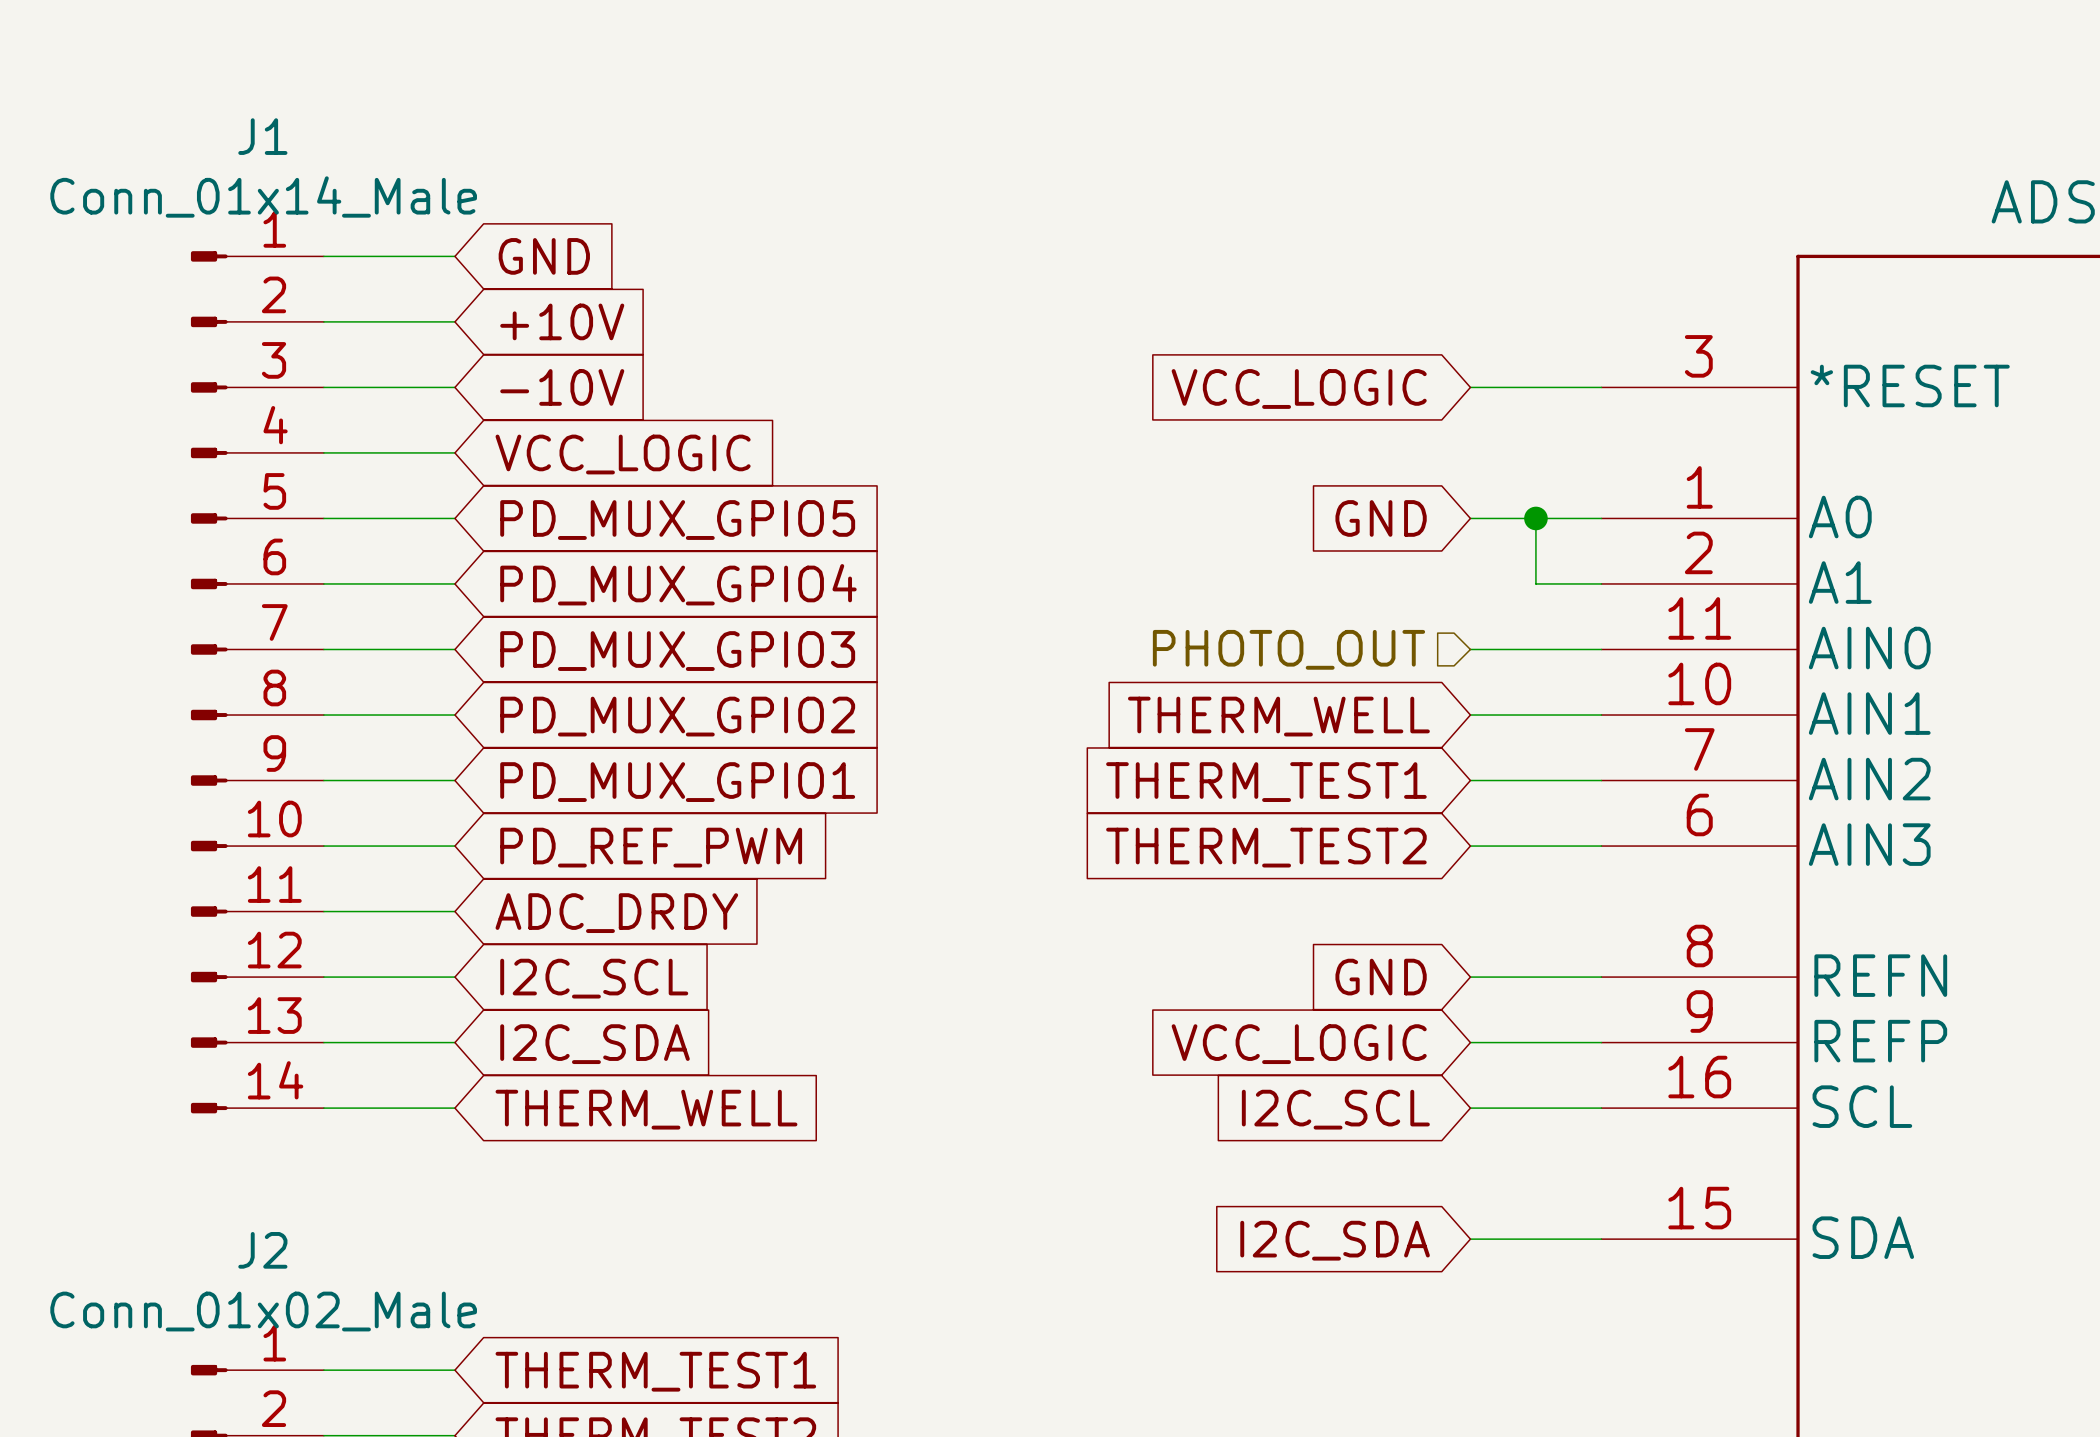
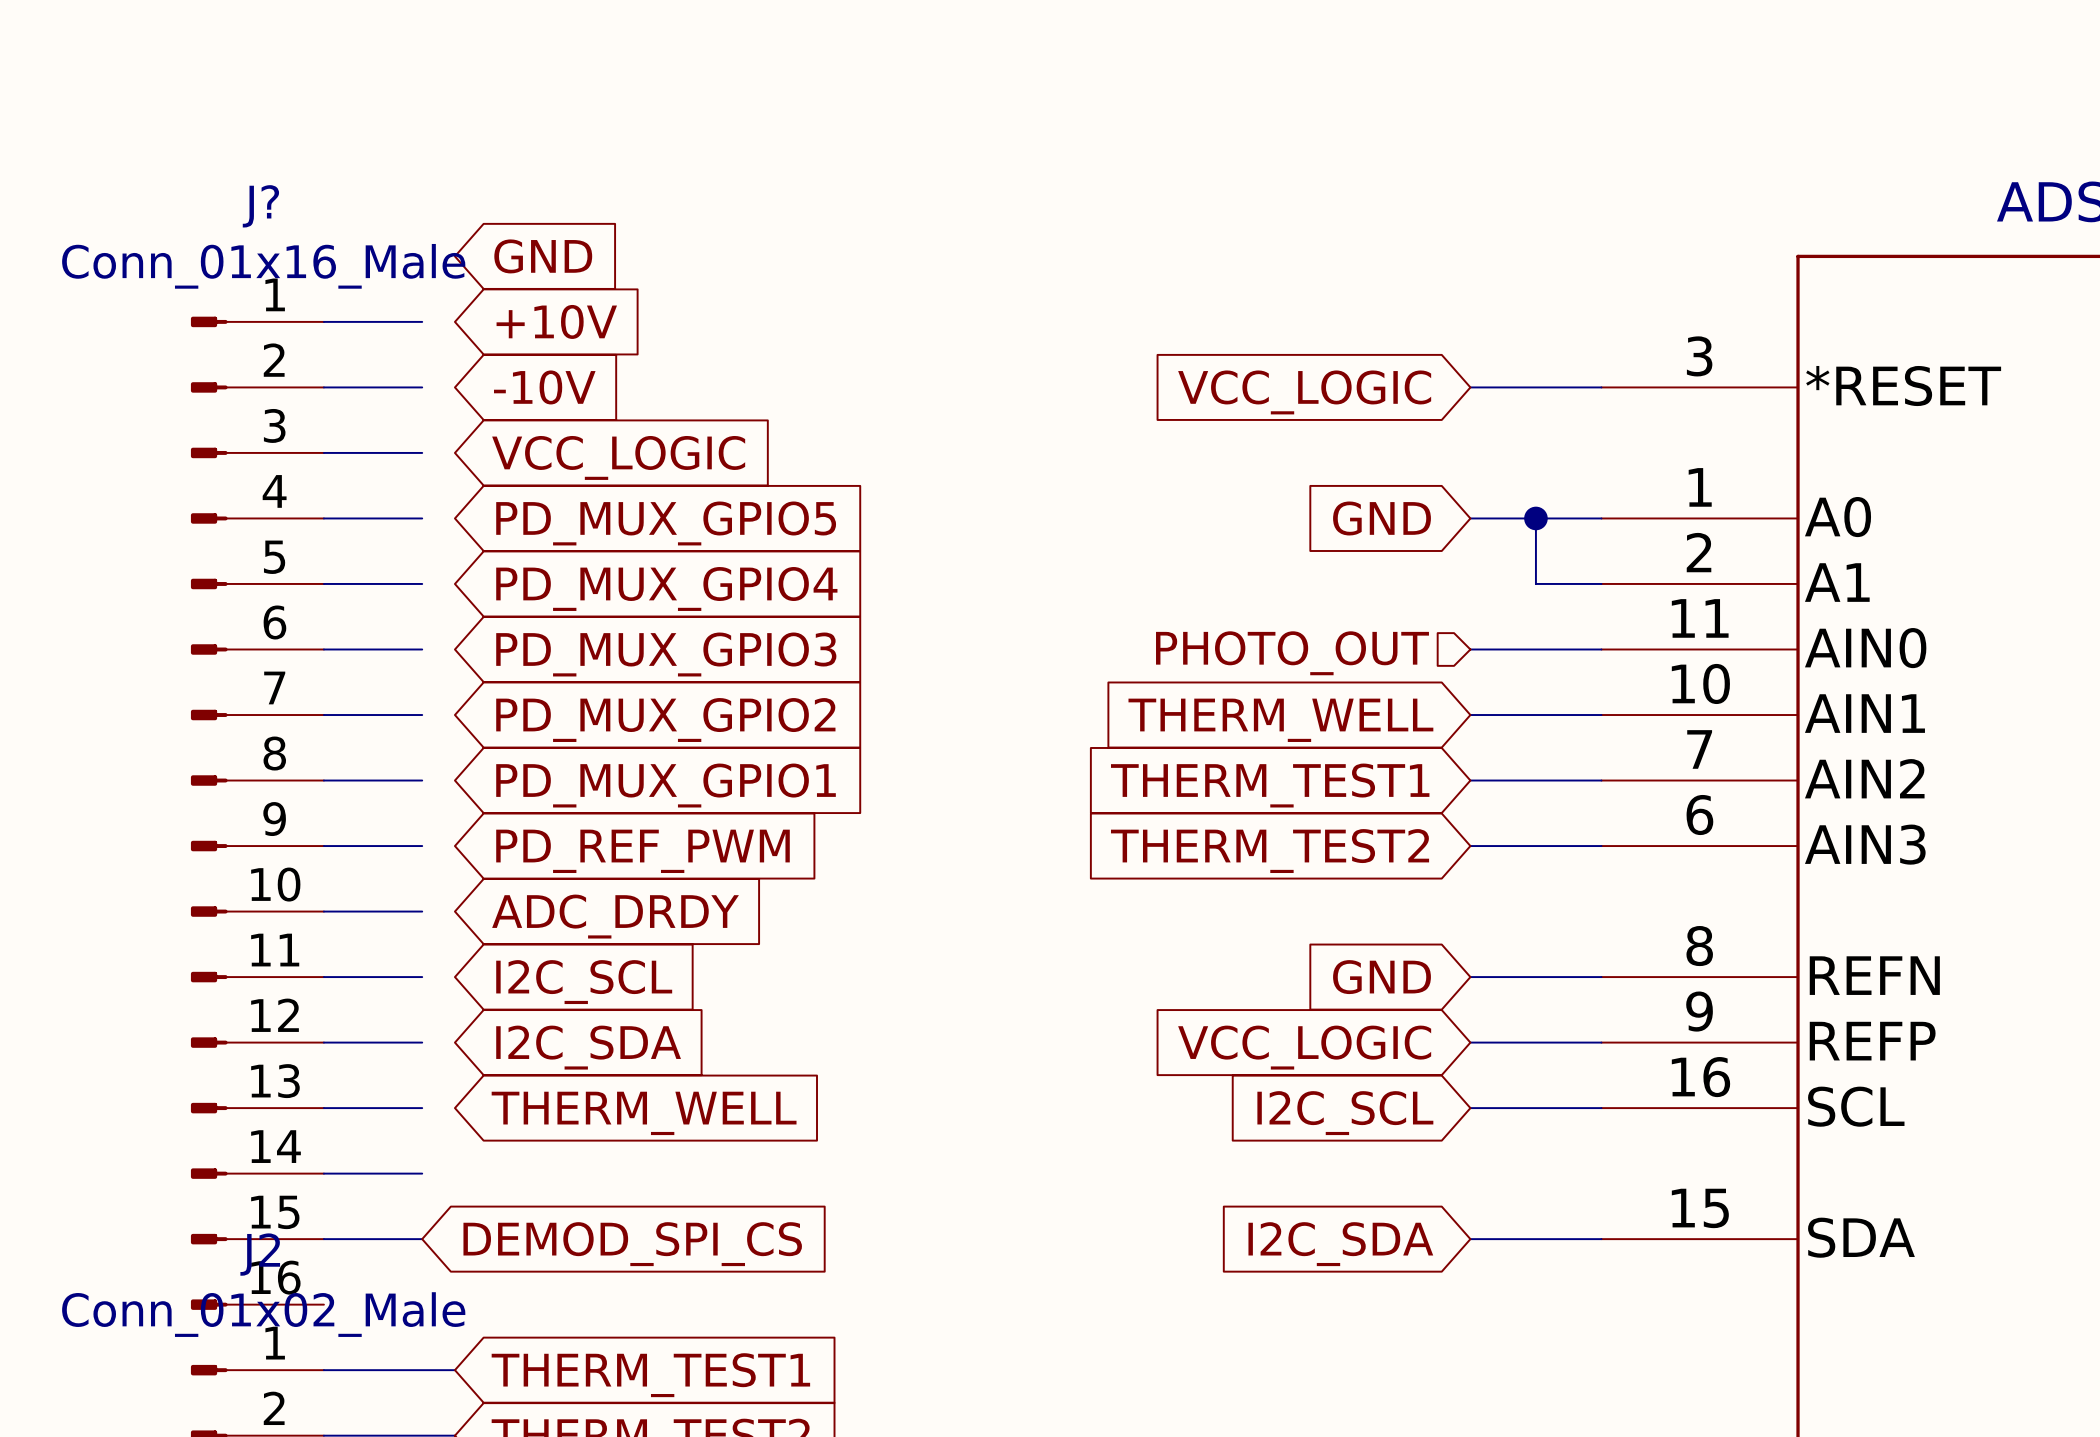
wire: (323, 256) (454, 256) -> none
wire: (422, 321) (454, 321) -> none
wire: (422, 387) (454, 387) -> none
wire: (422, 452) (454, 452) -> none
wire: (422, 518) (454, 518) -> none
wire: (422, 583) (454, 583) -> none
wire: (422, 649) (454, 649) -> none
J1: Conn_01x14_Male (257, 682) -> none
wire: (422, 715) (454, 715) -> none
wire: (422, 780) (454, 780) -> none
J?: none -> Conn_01x16_Male (257, 813)
wire: (422, 846) (454, 846) -> none
wire: (422, 911) (454, 911) -> none
wire: (422, 977) (454, 977) -> none
wire: (422, 1042) (454, 1042) -> none
wire: (422, 1108) (454, 1108) -> none
wire: none -> (323, 1173) (422, 1173)
wire: none -> (323, 1239) (422, 1239)
global label: none -> DEMOD_SPI_CS (632, 1244)

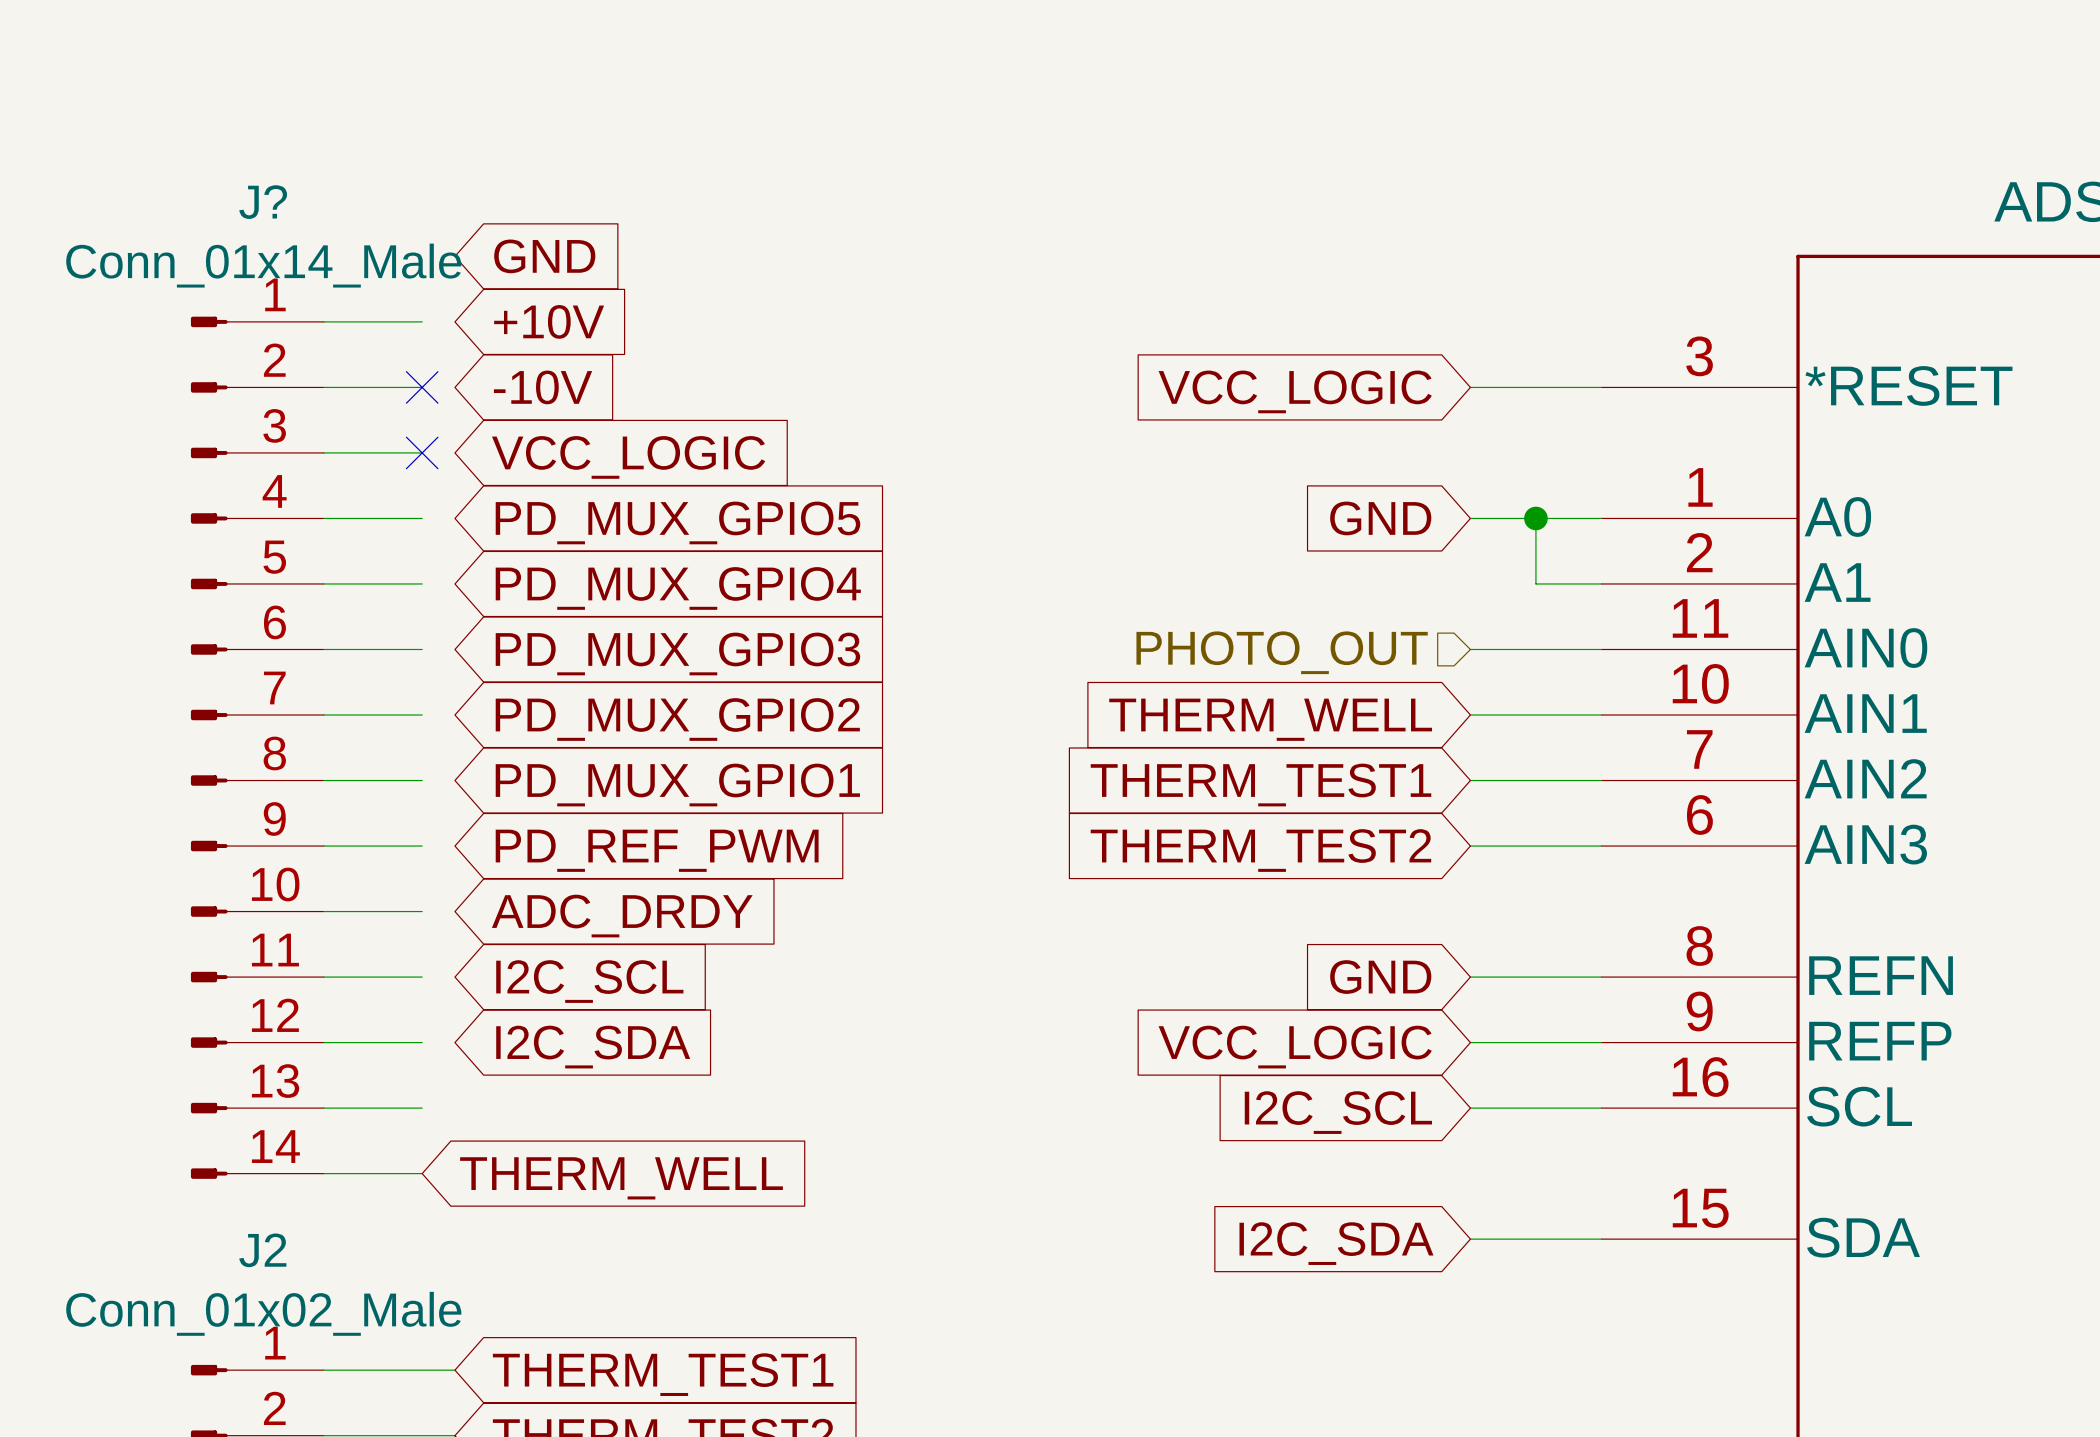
no-connect mark: none -> (422, 387)
no-connect mark: none -> (422, 452)
J?: none -> Conn_01x14_Male (257, 747)
J?: Conn_01x16_Male (257, 813) -> none
global label position: THERM_WELL (644, 1113) -> THERM_WELL (621, 1178)
wire: (323, 1239) (422, 1239) -> none
global label: DEMOD_SPI_CS (632, 1244) -> none

